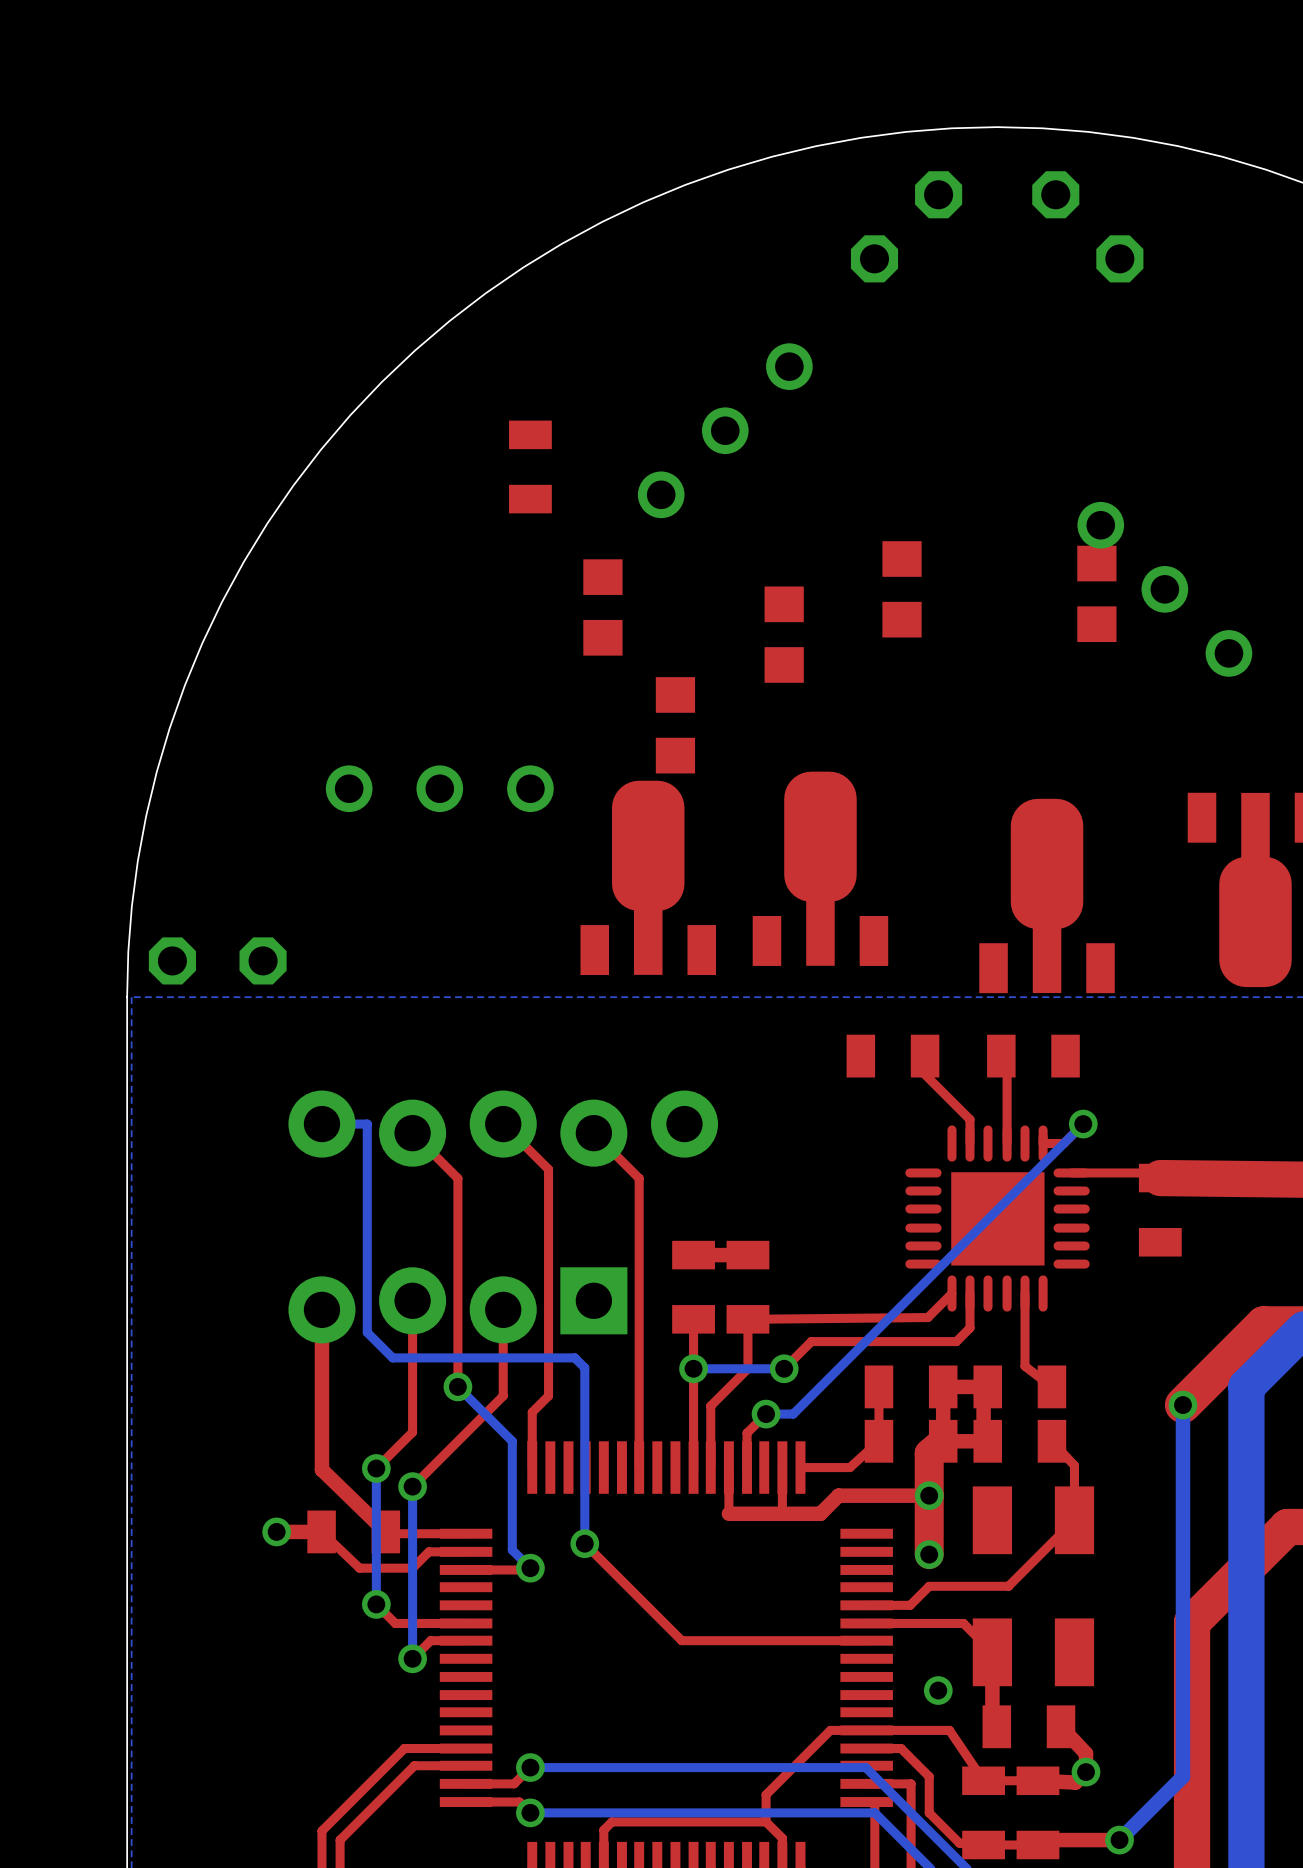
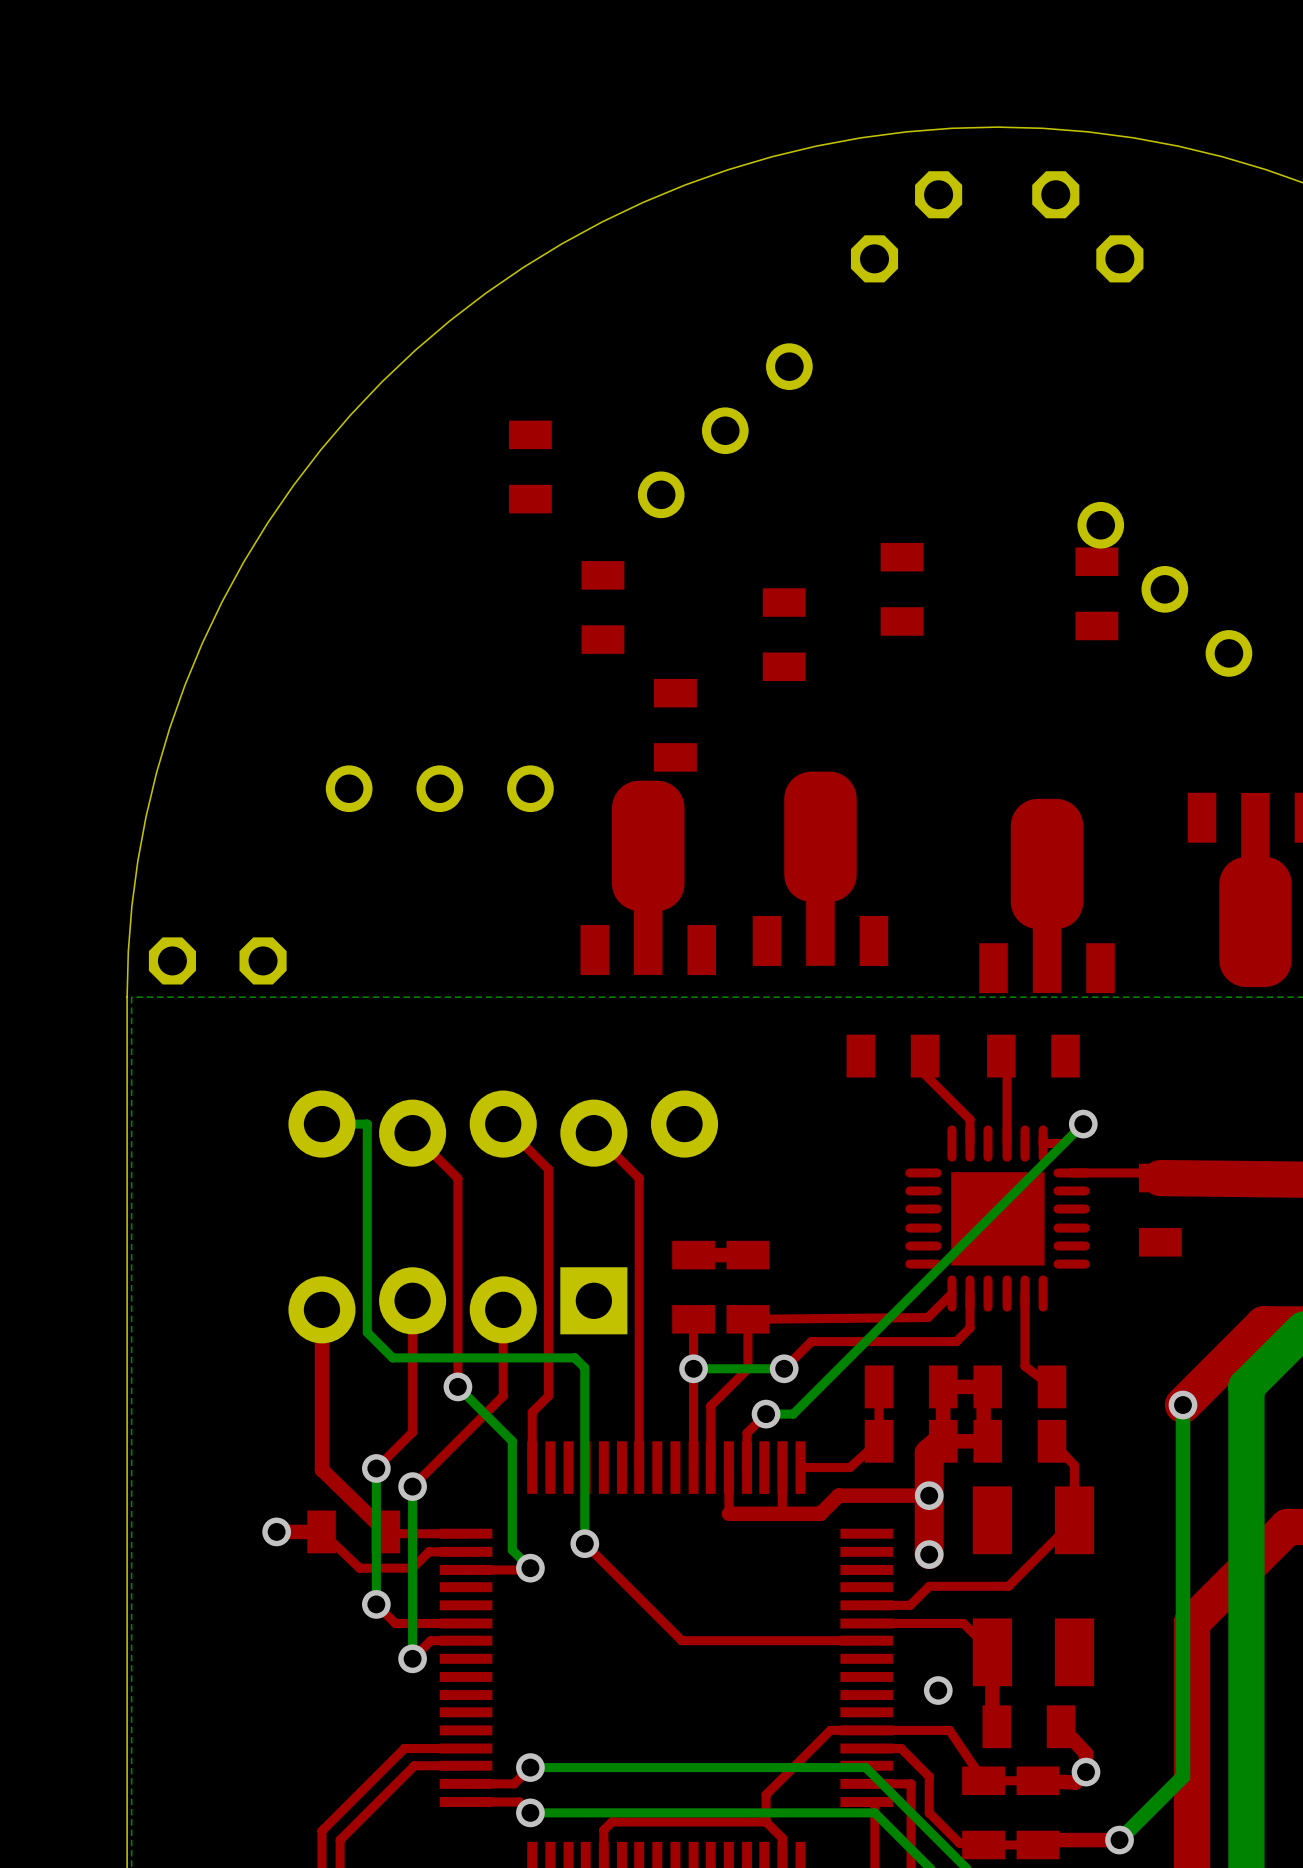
part footprint: [882, 541, 922, 638] -> [880, 542, 924, 636]
part footprint: [1077, 545, 1117, 643] -> [1075, 547, 1119, 641]
part footprint: [583, 559, 623, 656] -> [581, 561, 625, 654]
part footprint: [764, 586, 804, 683] -> [762, 588, 806, 682]
part footprint: [655, 677, 696, 774] -> [654, 678, 697, 772]

